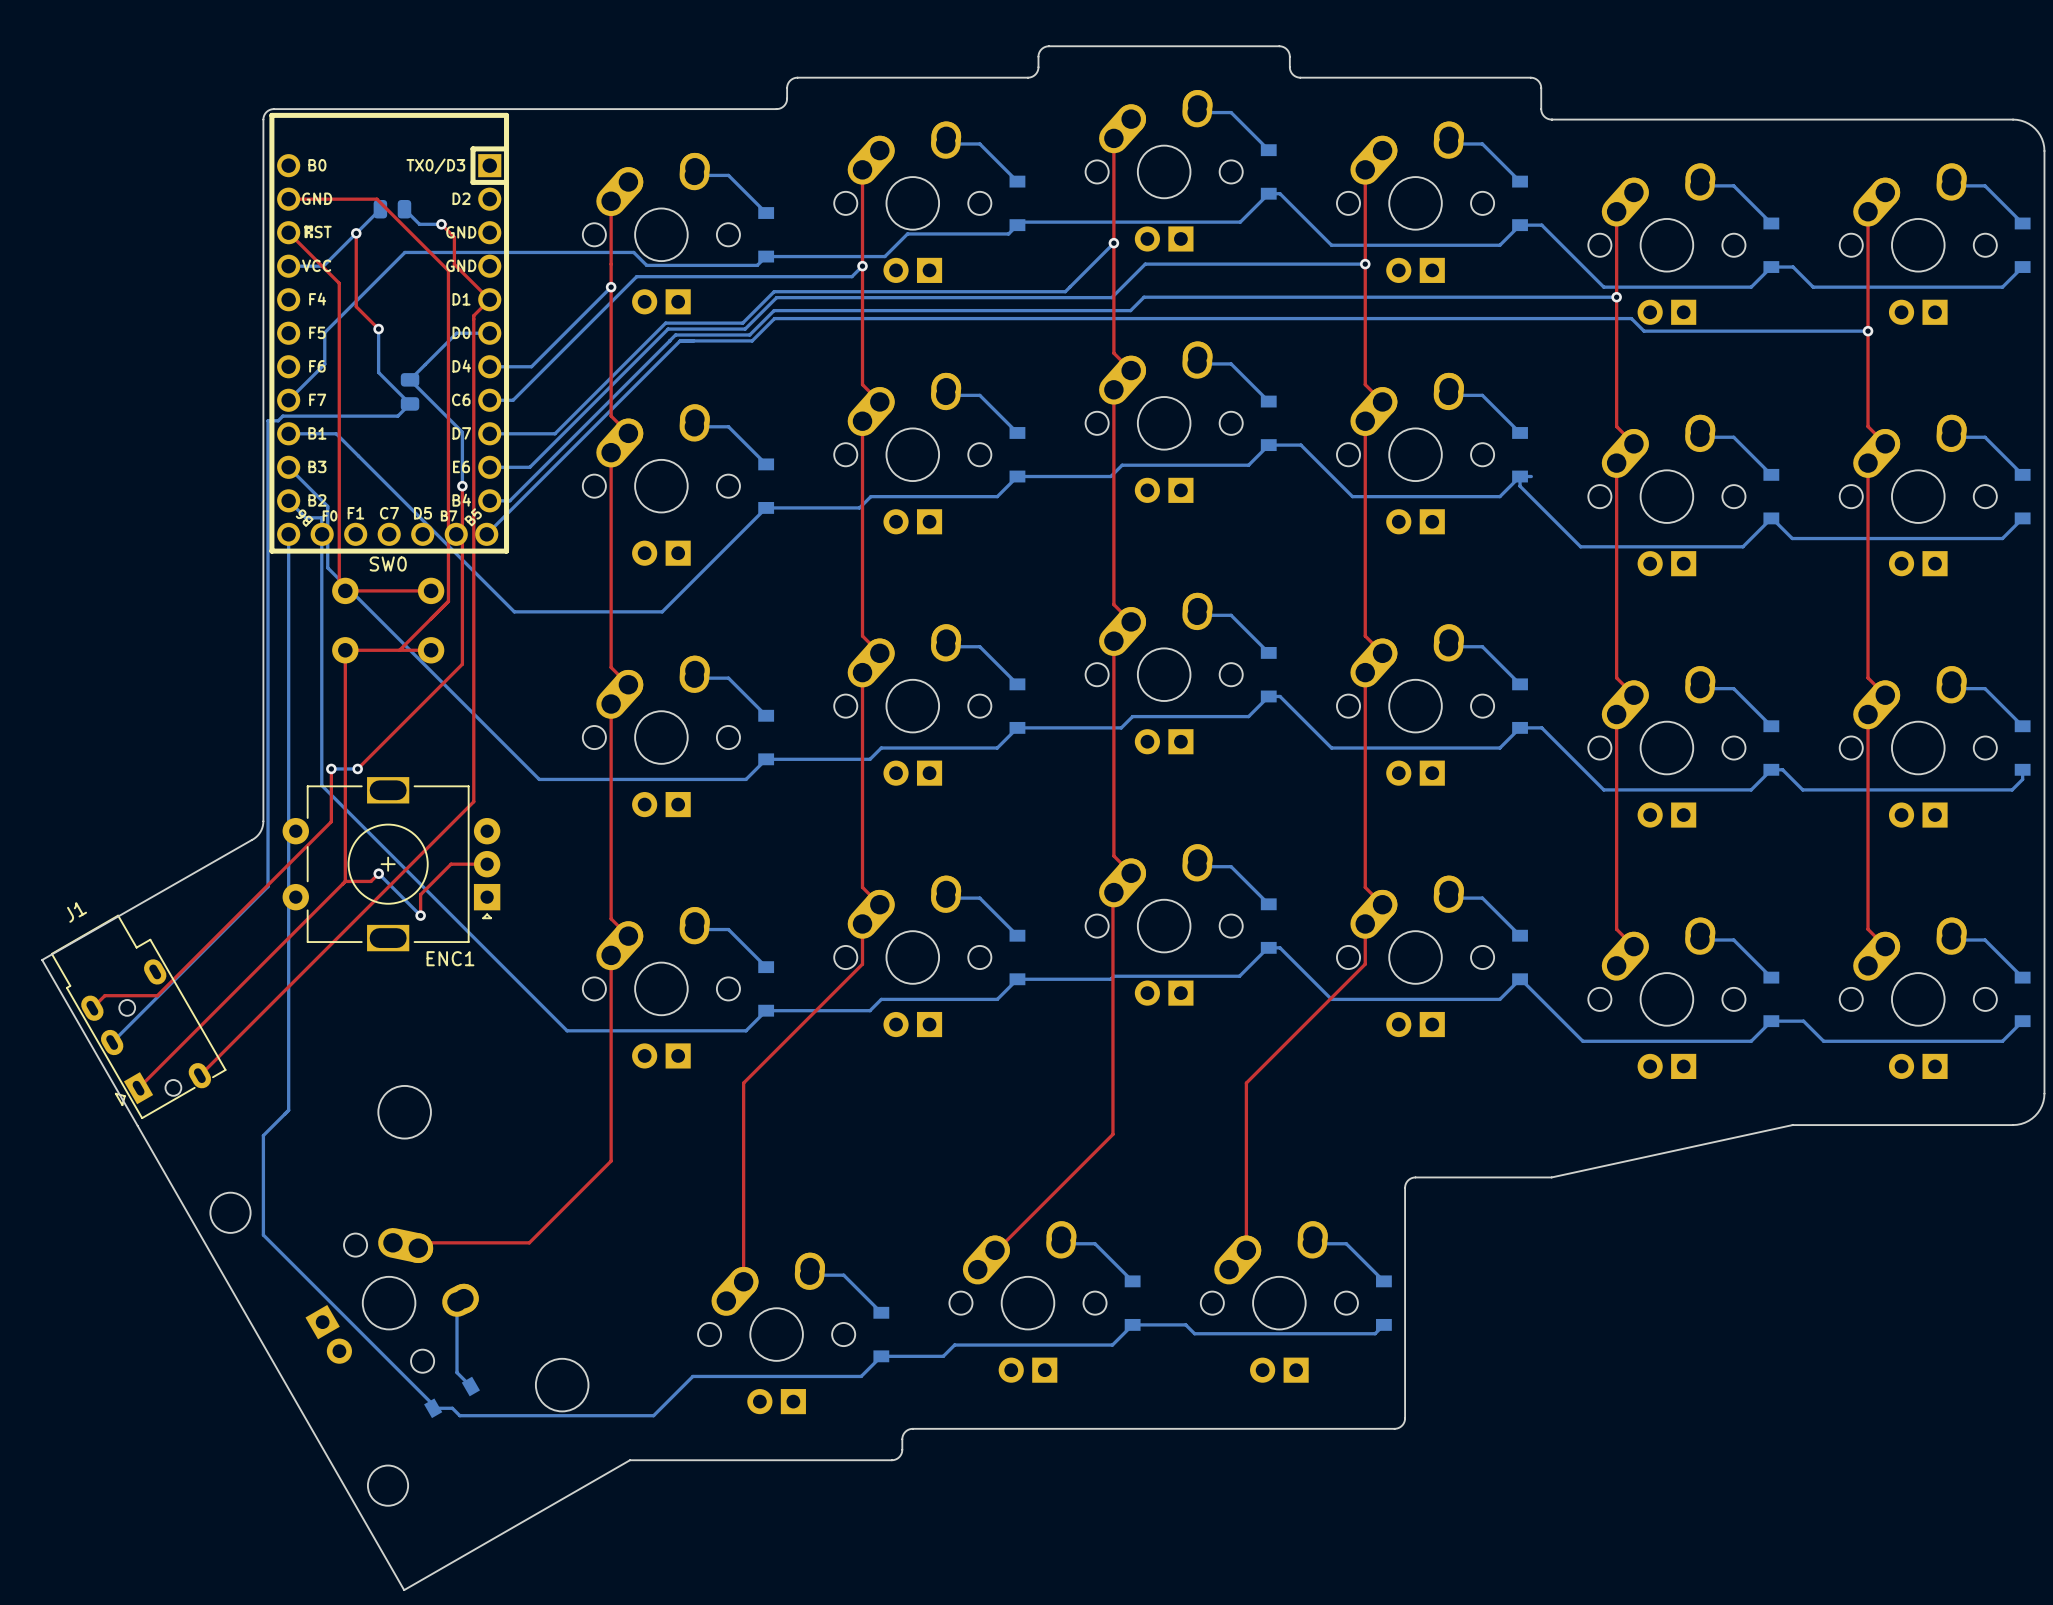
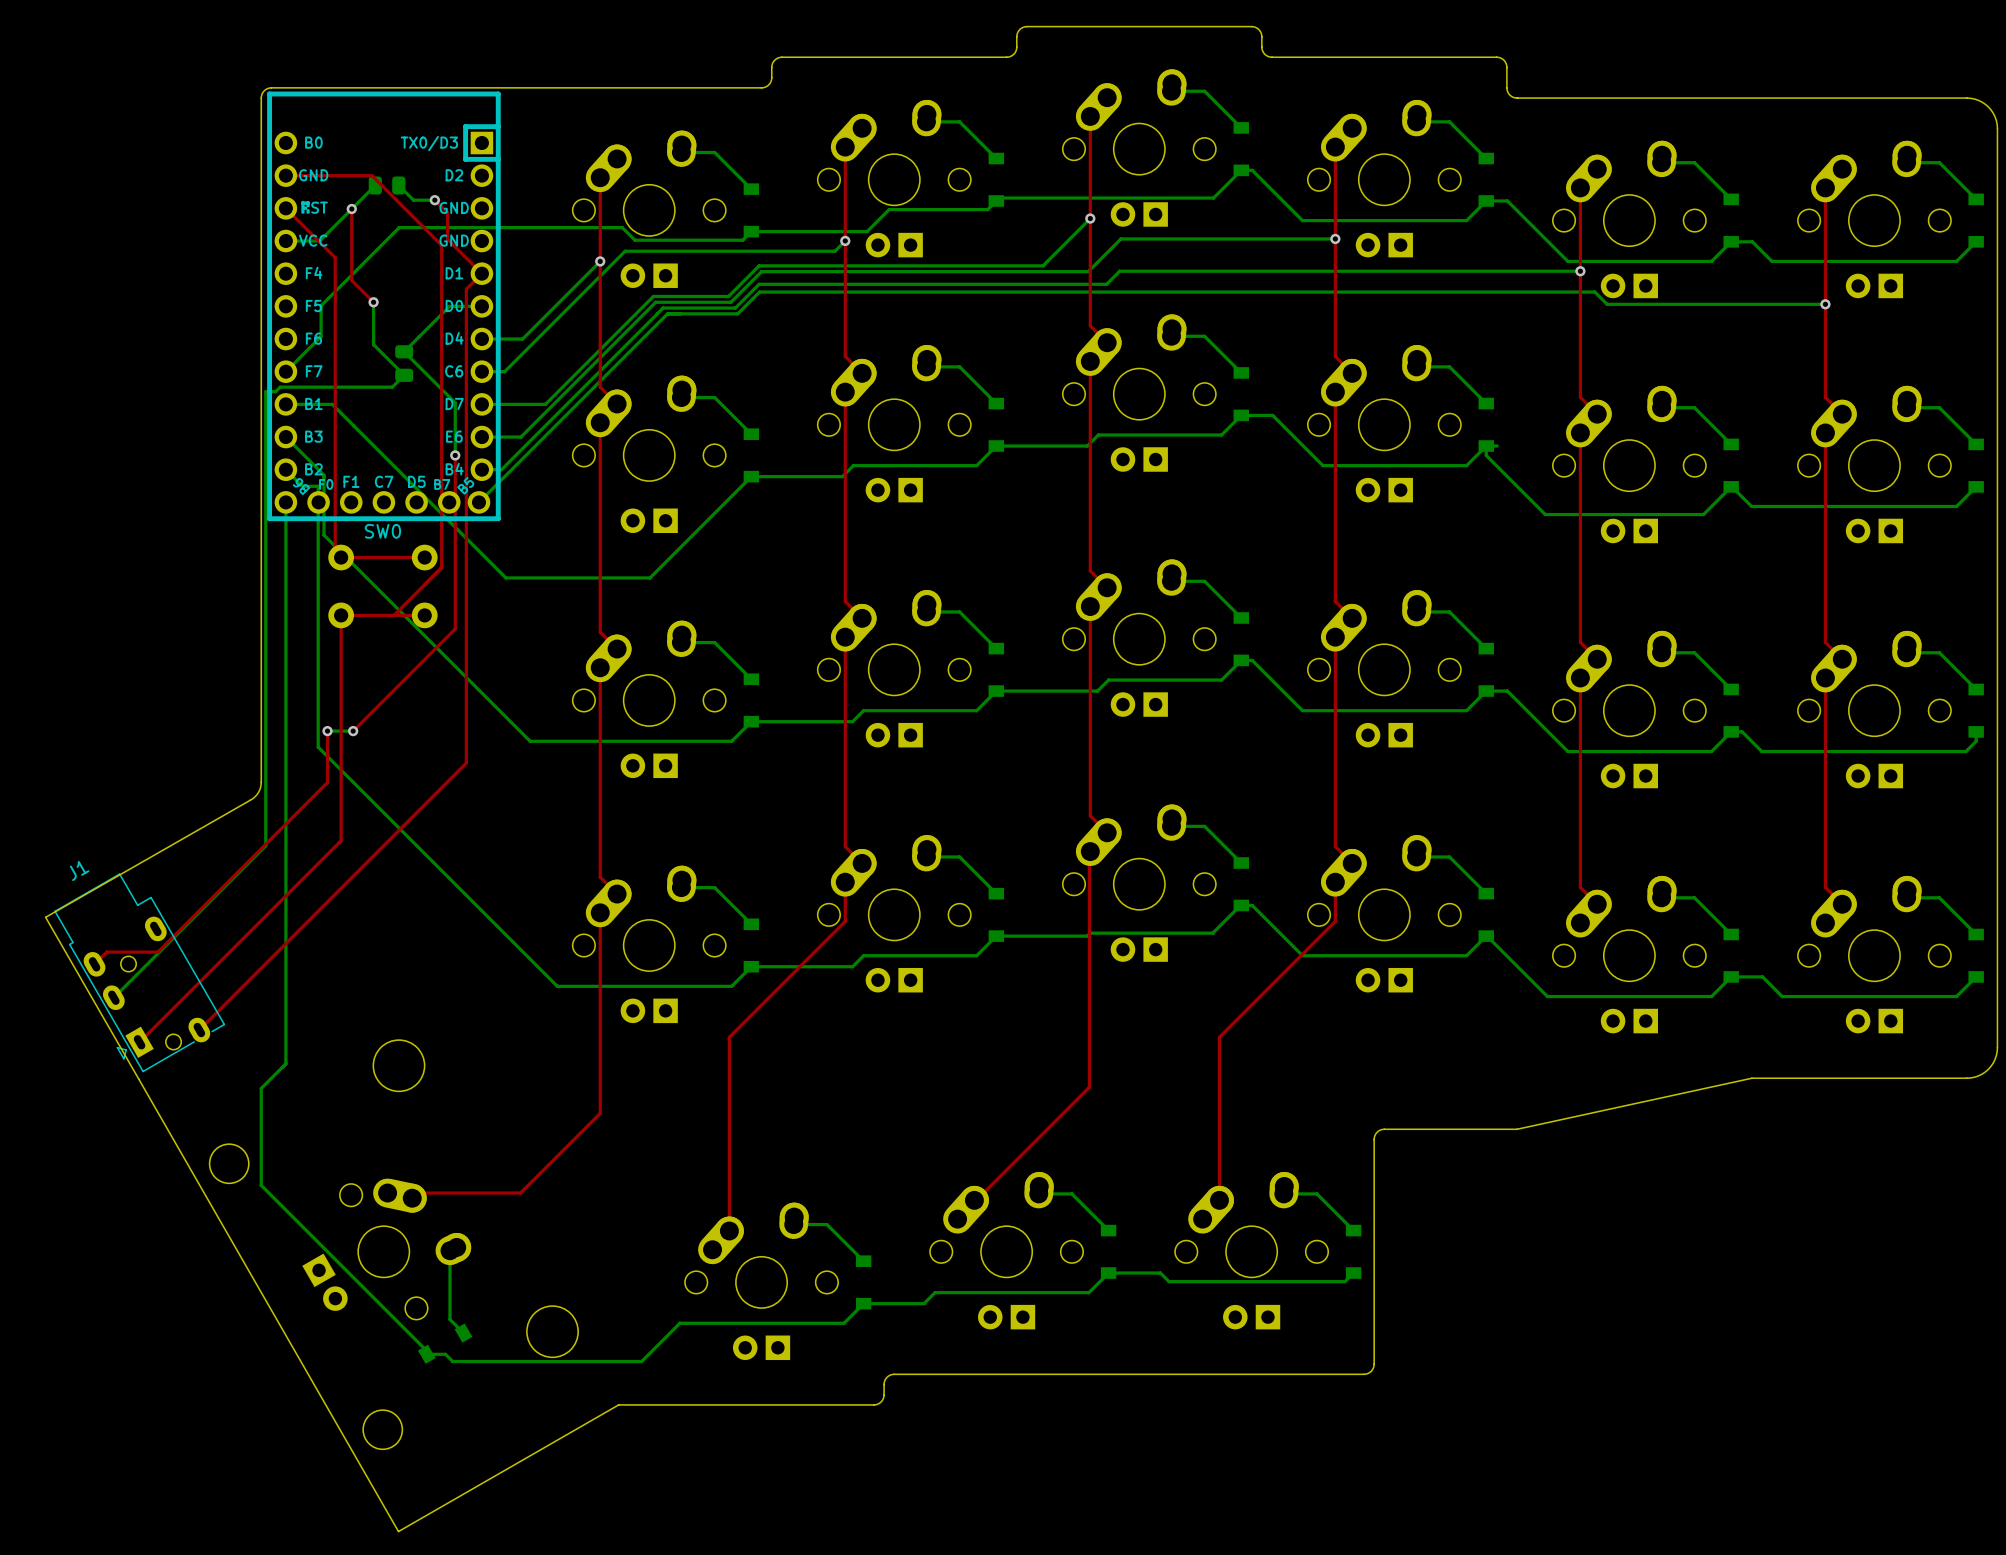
ENC1: (391, 864) -> none
top track: (487, 864) (451, 864) (420, 894) (420, 915) -> none
bottom track: (378, 873) (420, 915) -> none
top track: (378, 873) (371, 881) (345, 881) -> none
via: (378, 873) -> none
via: (420, 915) -> none

